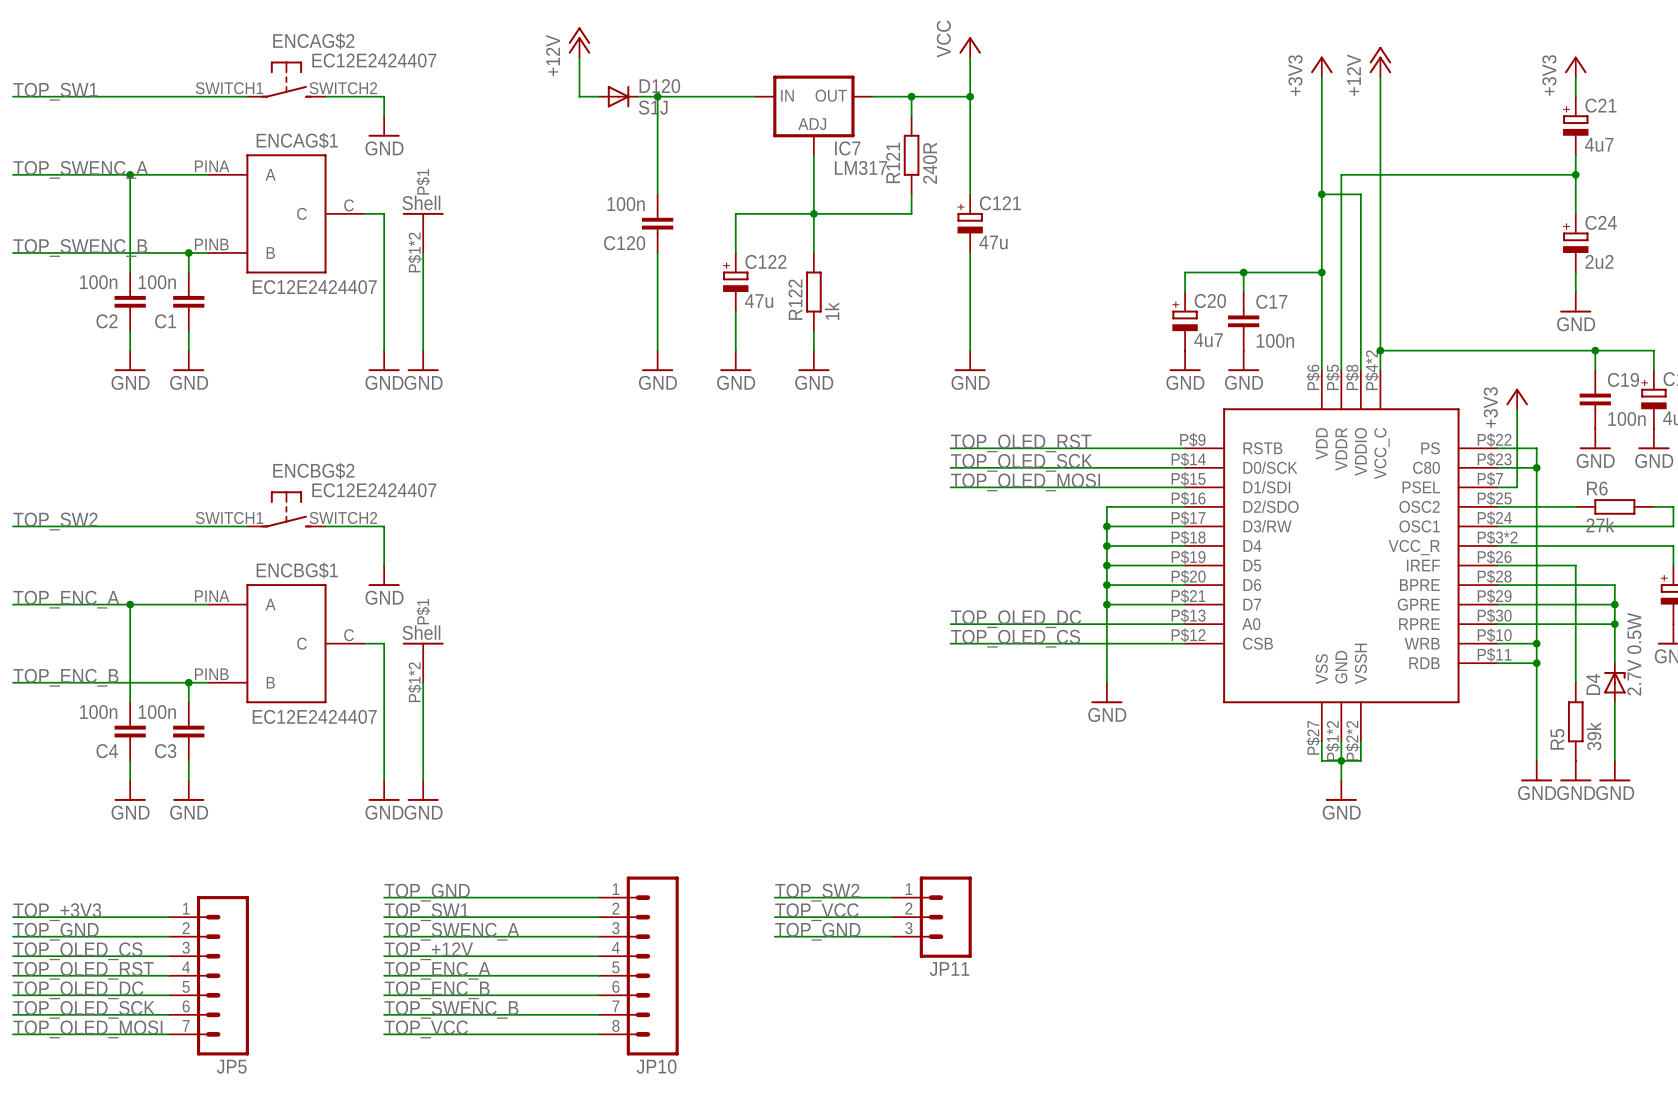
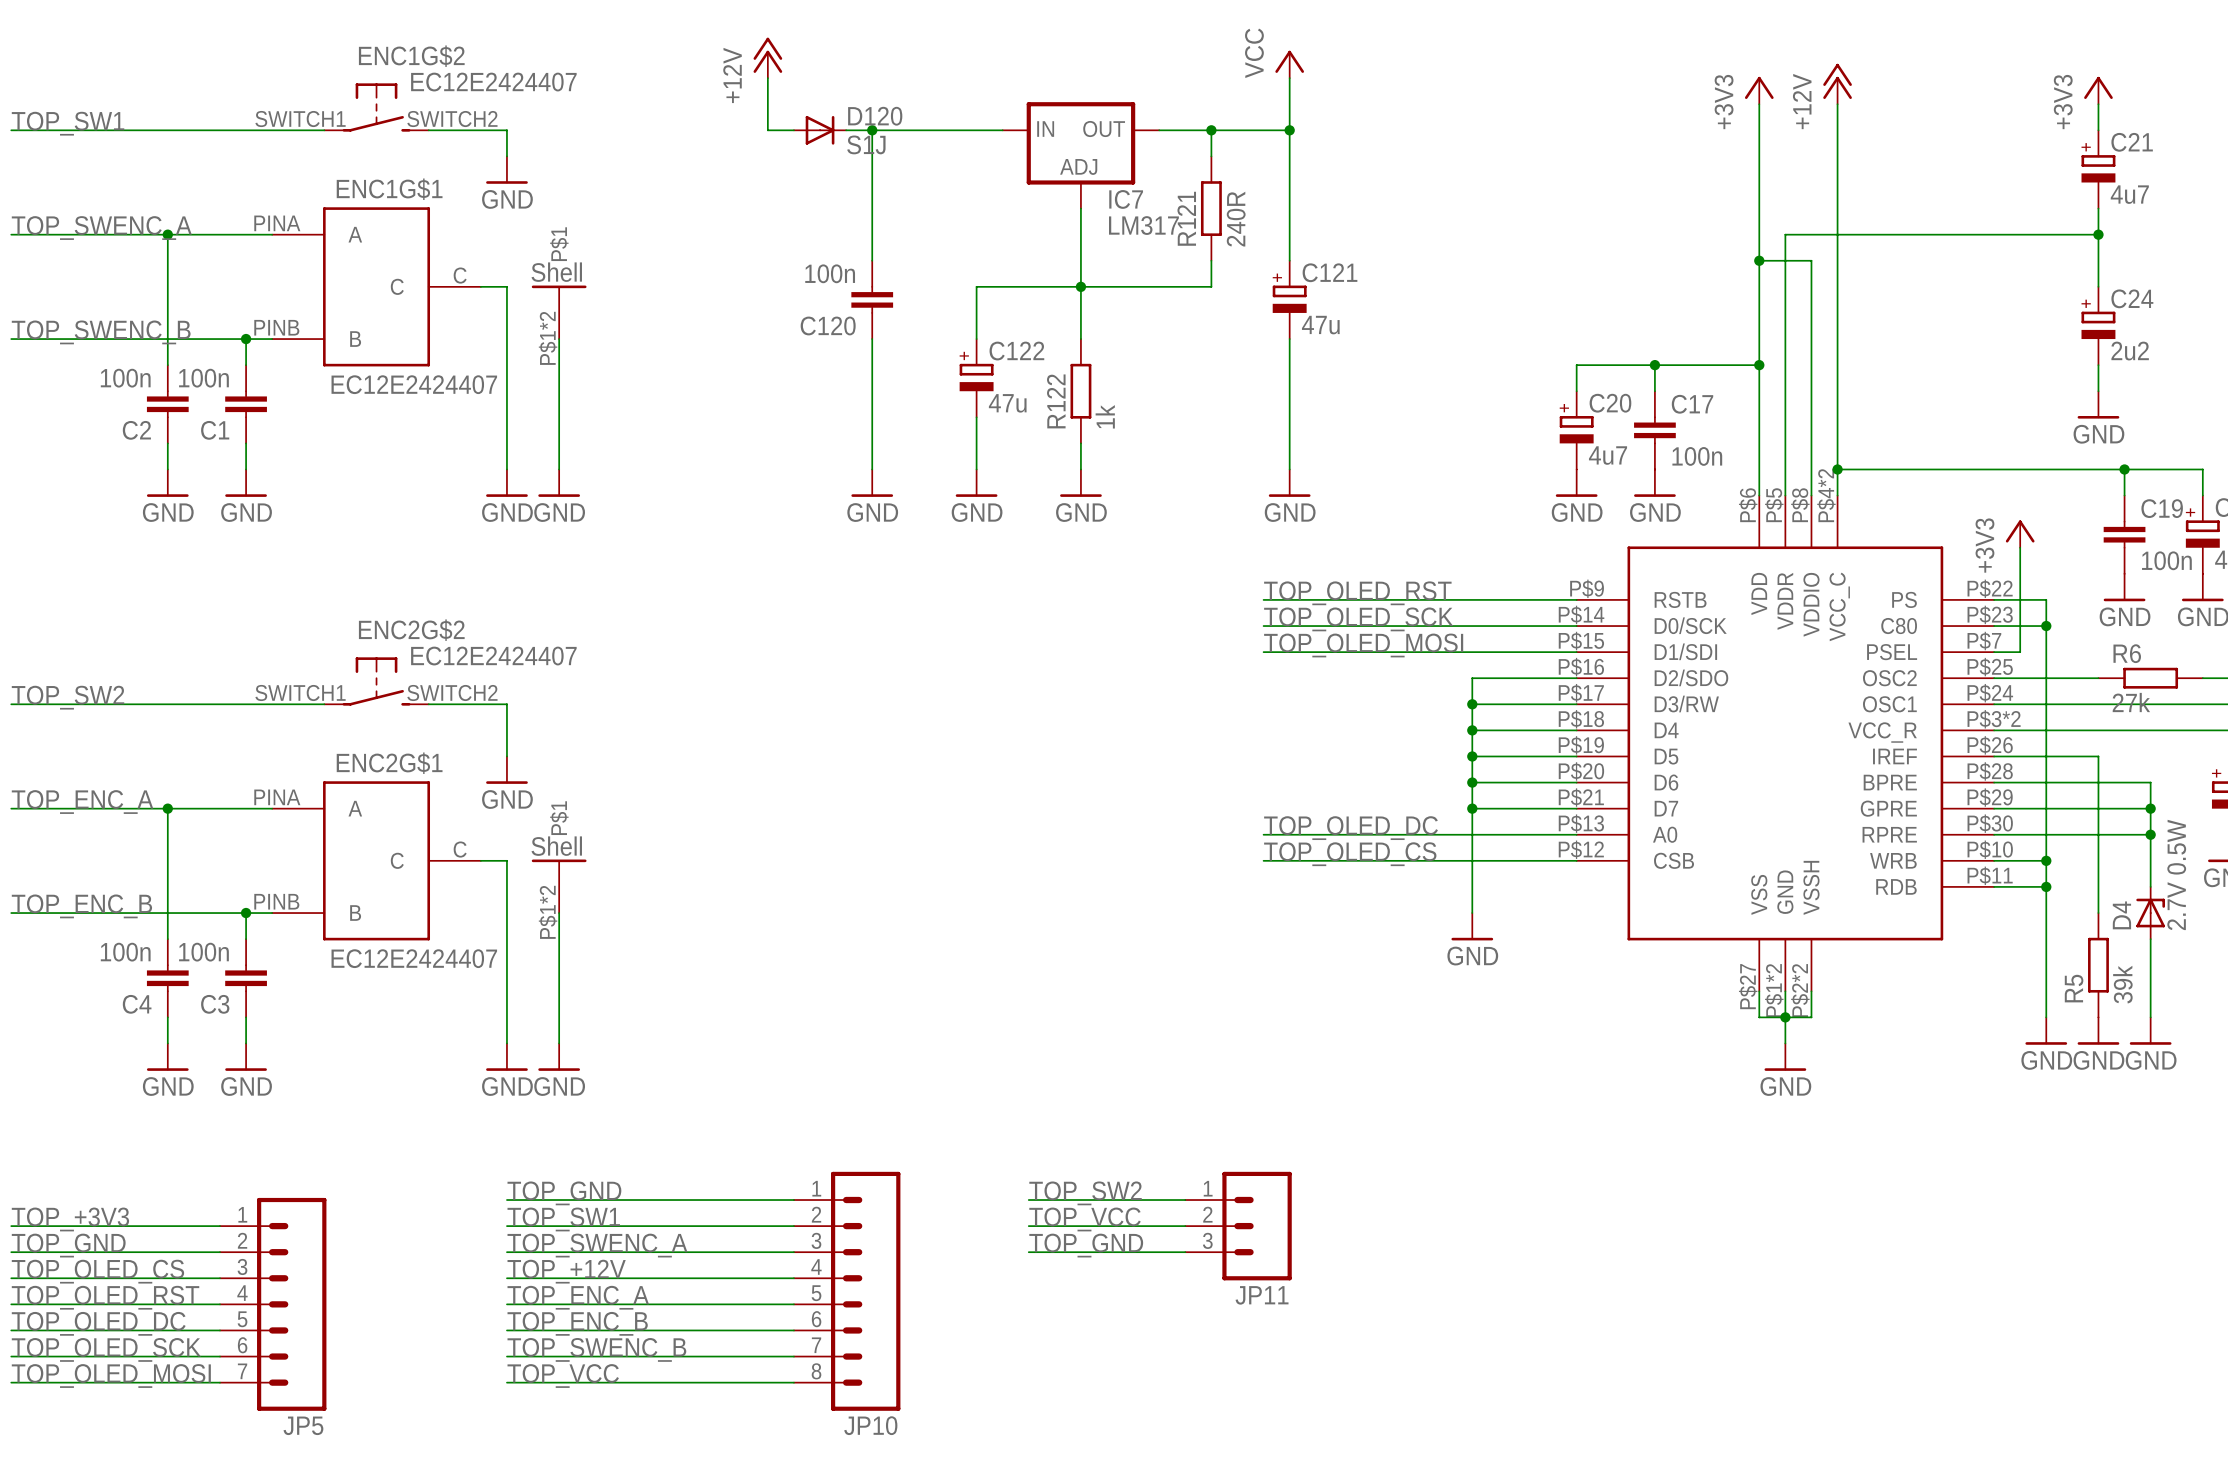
ENCAG$2 name: ENCAG$2 (313, 41) -> ENC1G$2 (411, 56)
ENCAG$1 name: ENCAG$1 (297, 140) -> ENC1G$1 (389, 189)
ENCBG$2 name: ENCBG$2 (313, 470) -> ENC2G$2 (411, 630)
ENCBG$1 name: ENCBG$1 (297, 570) -> ENC2G$1 (389, 763)

